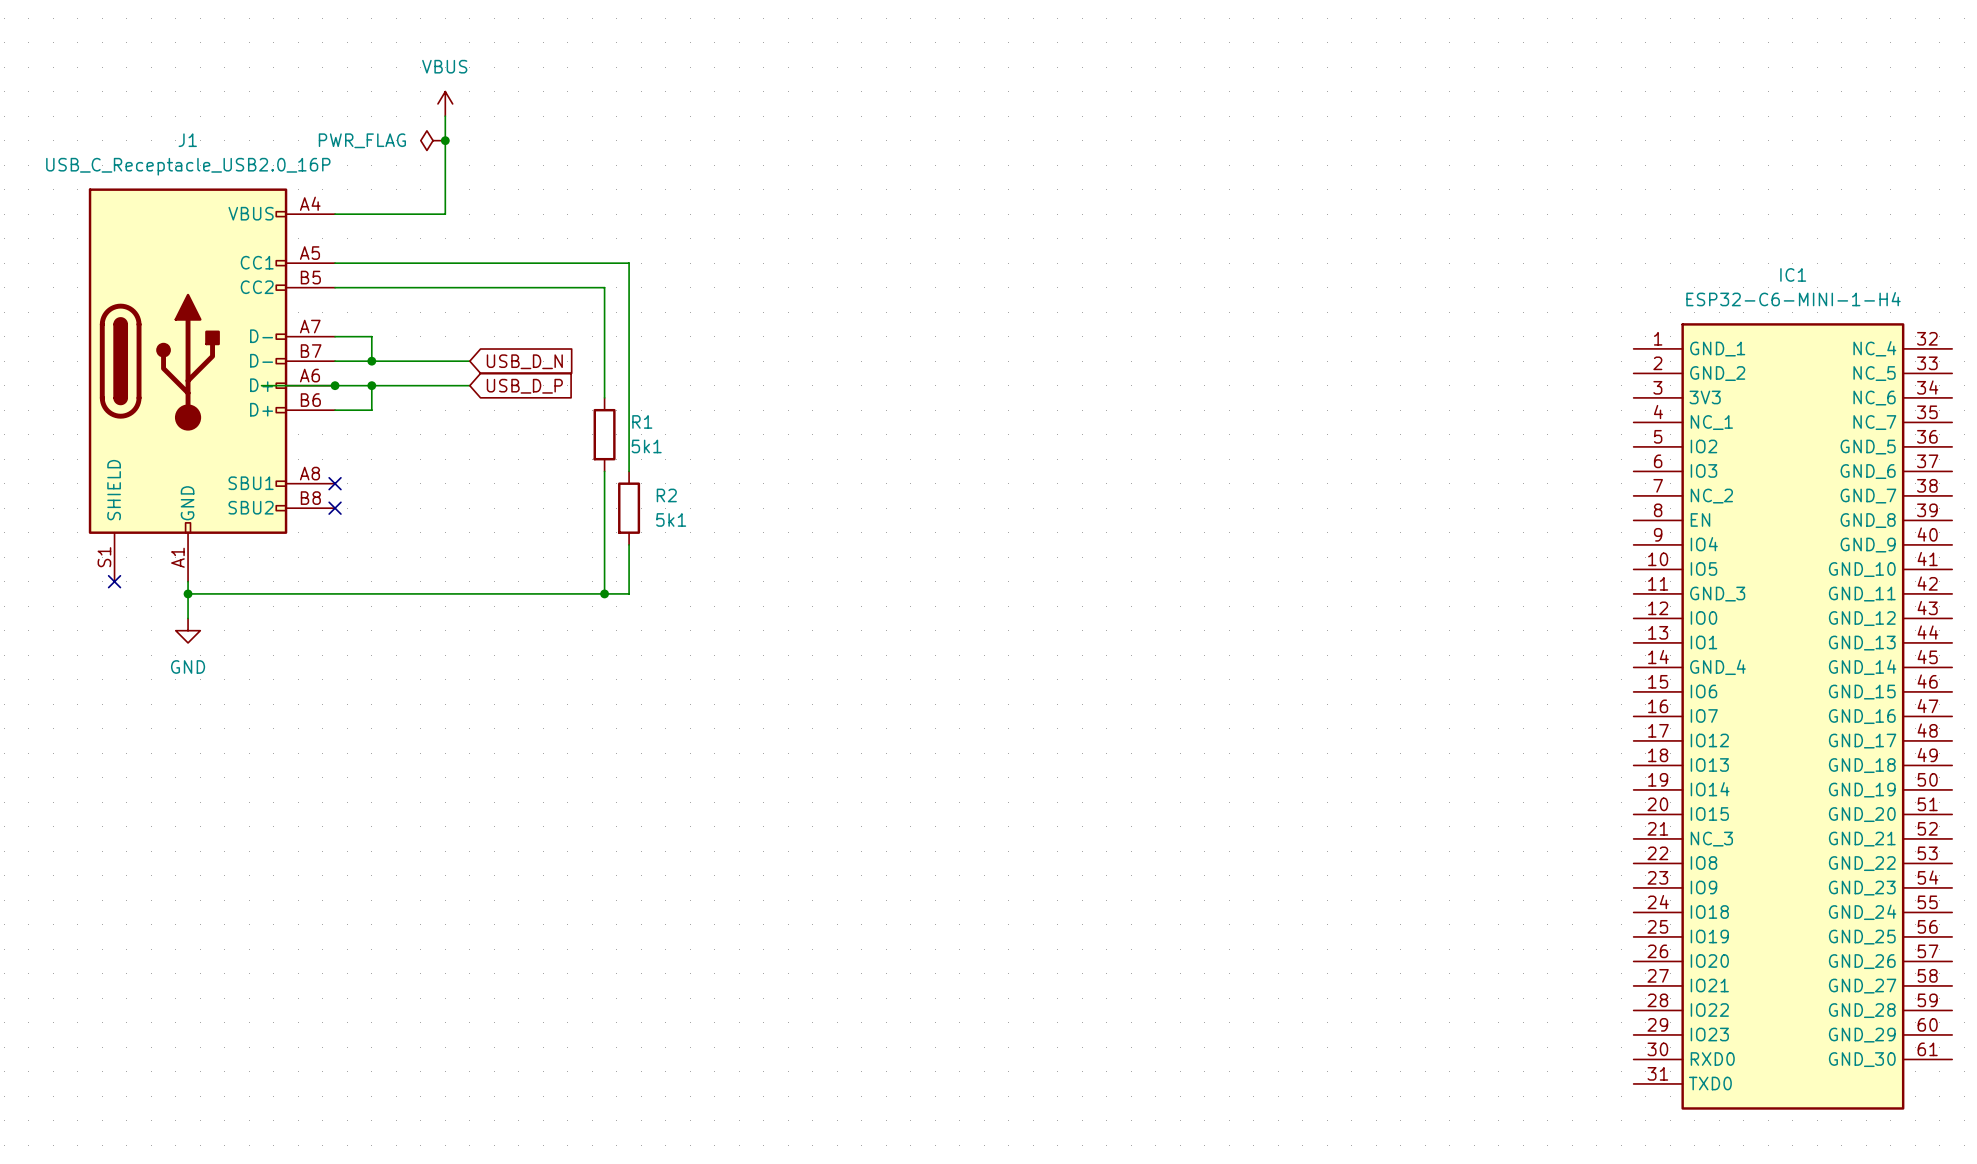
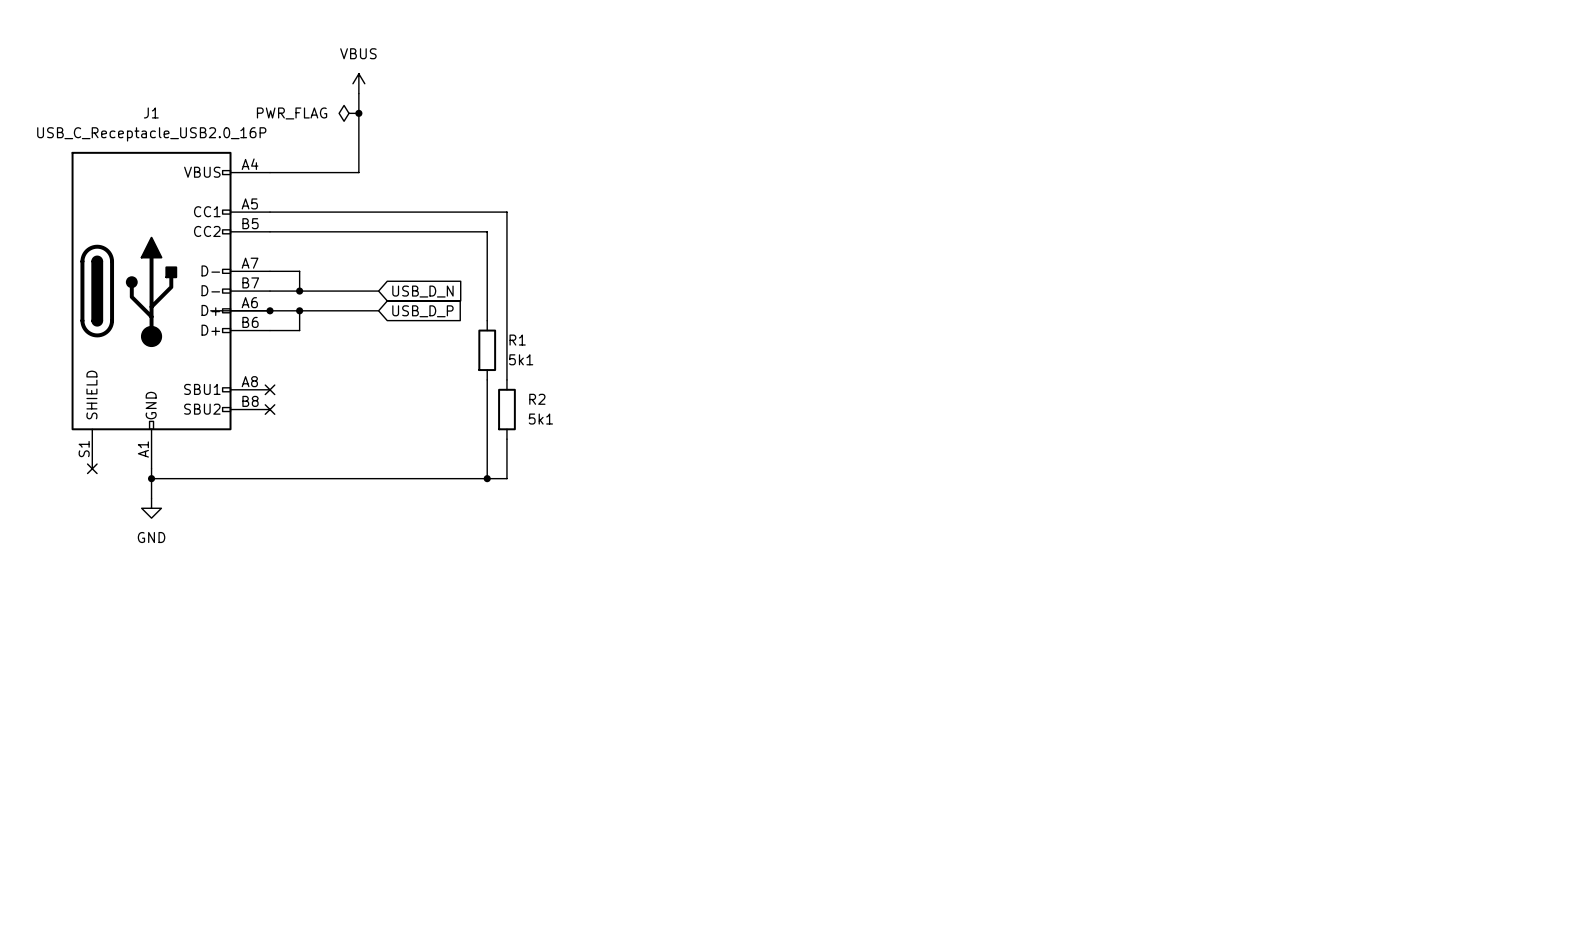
IC1: ESP32-C6-MINI-1-H4 (1792, 716) -> none

